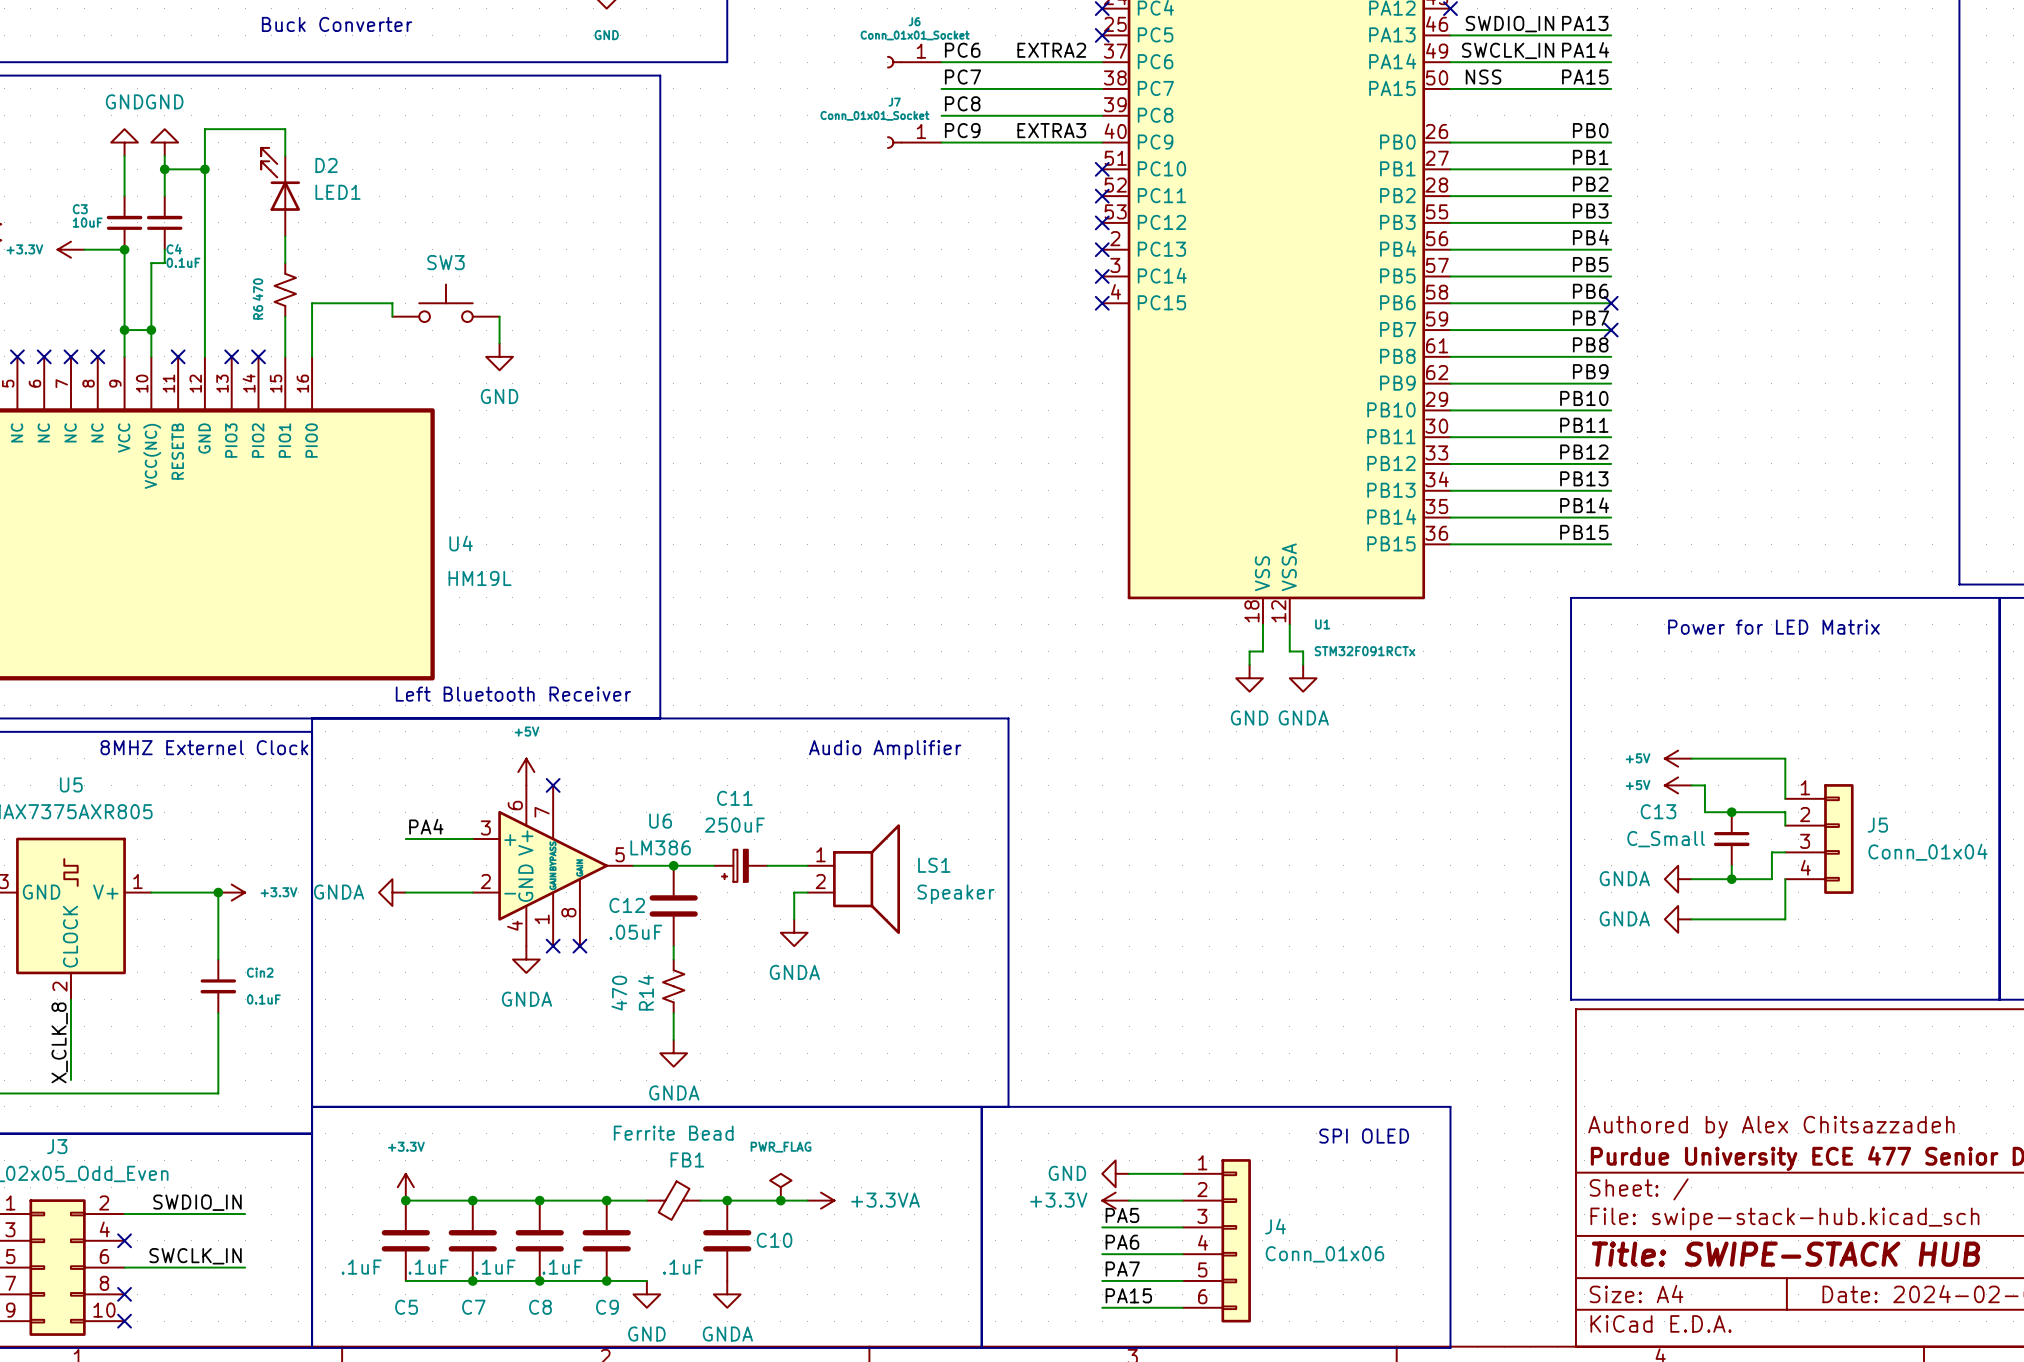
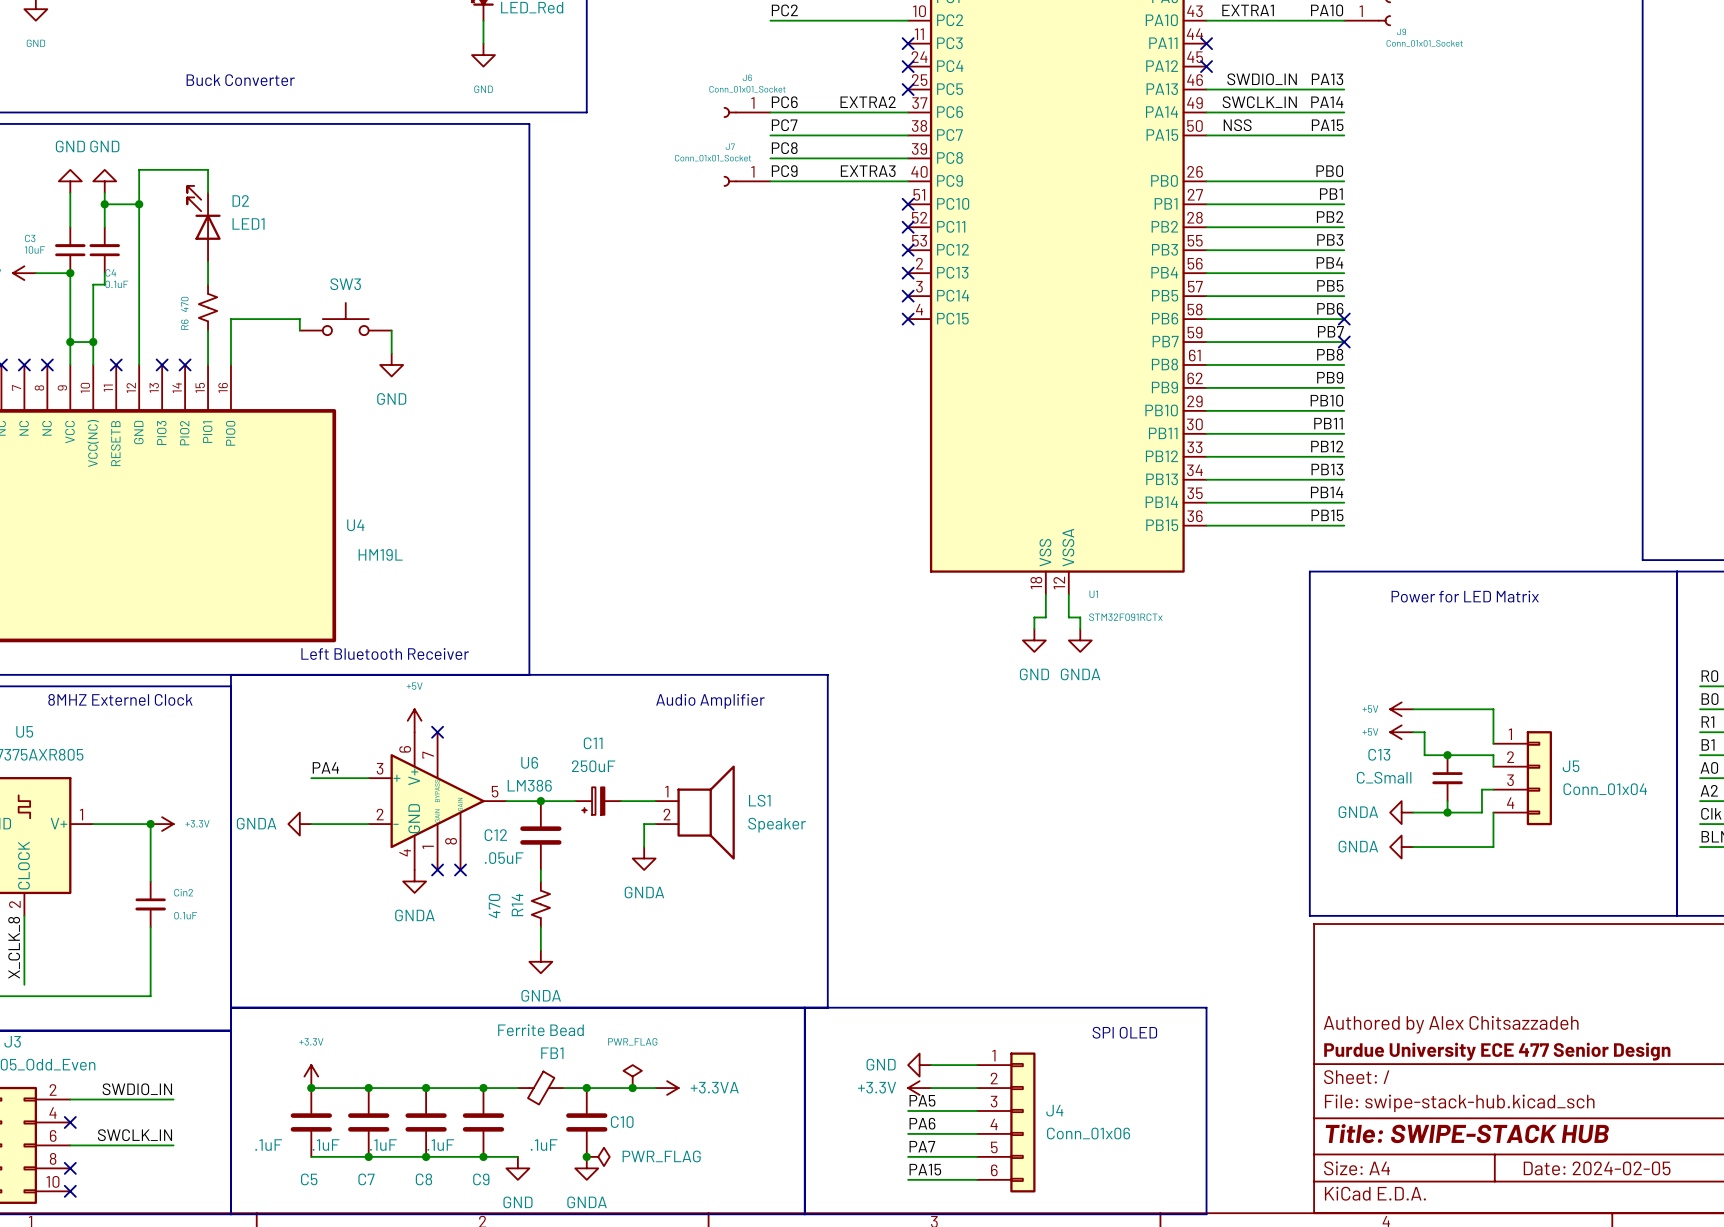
junction: none -> (586, 1156)
power symbol: none -> PWR_FLAG (598, 1156)

